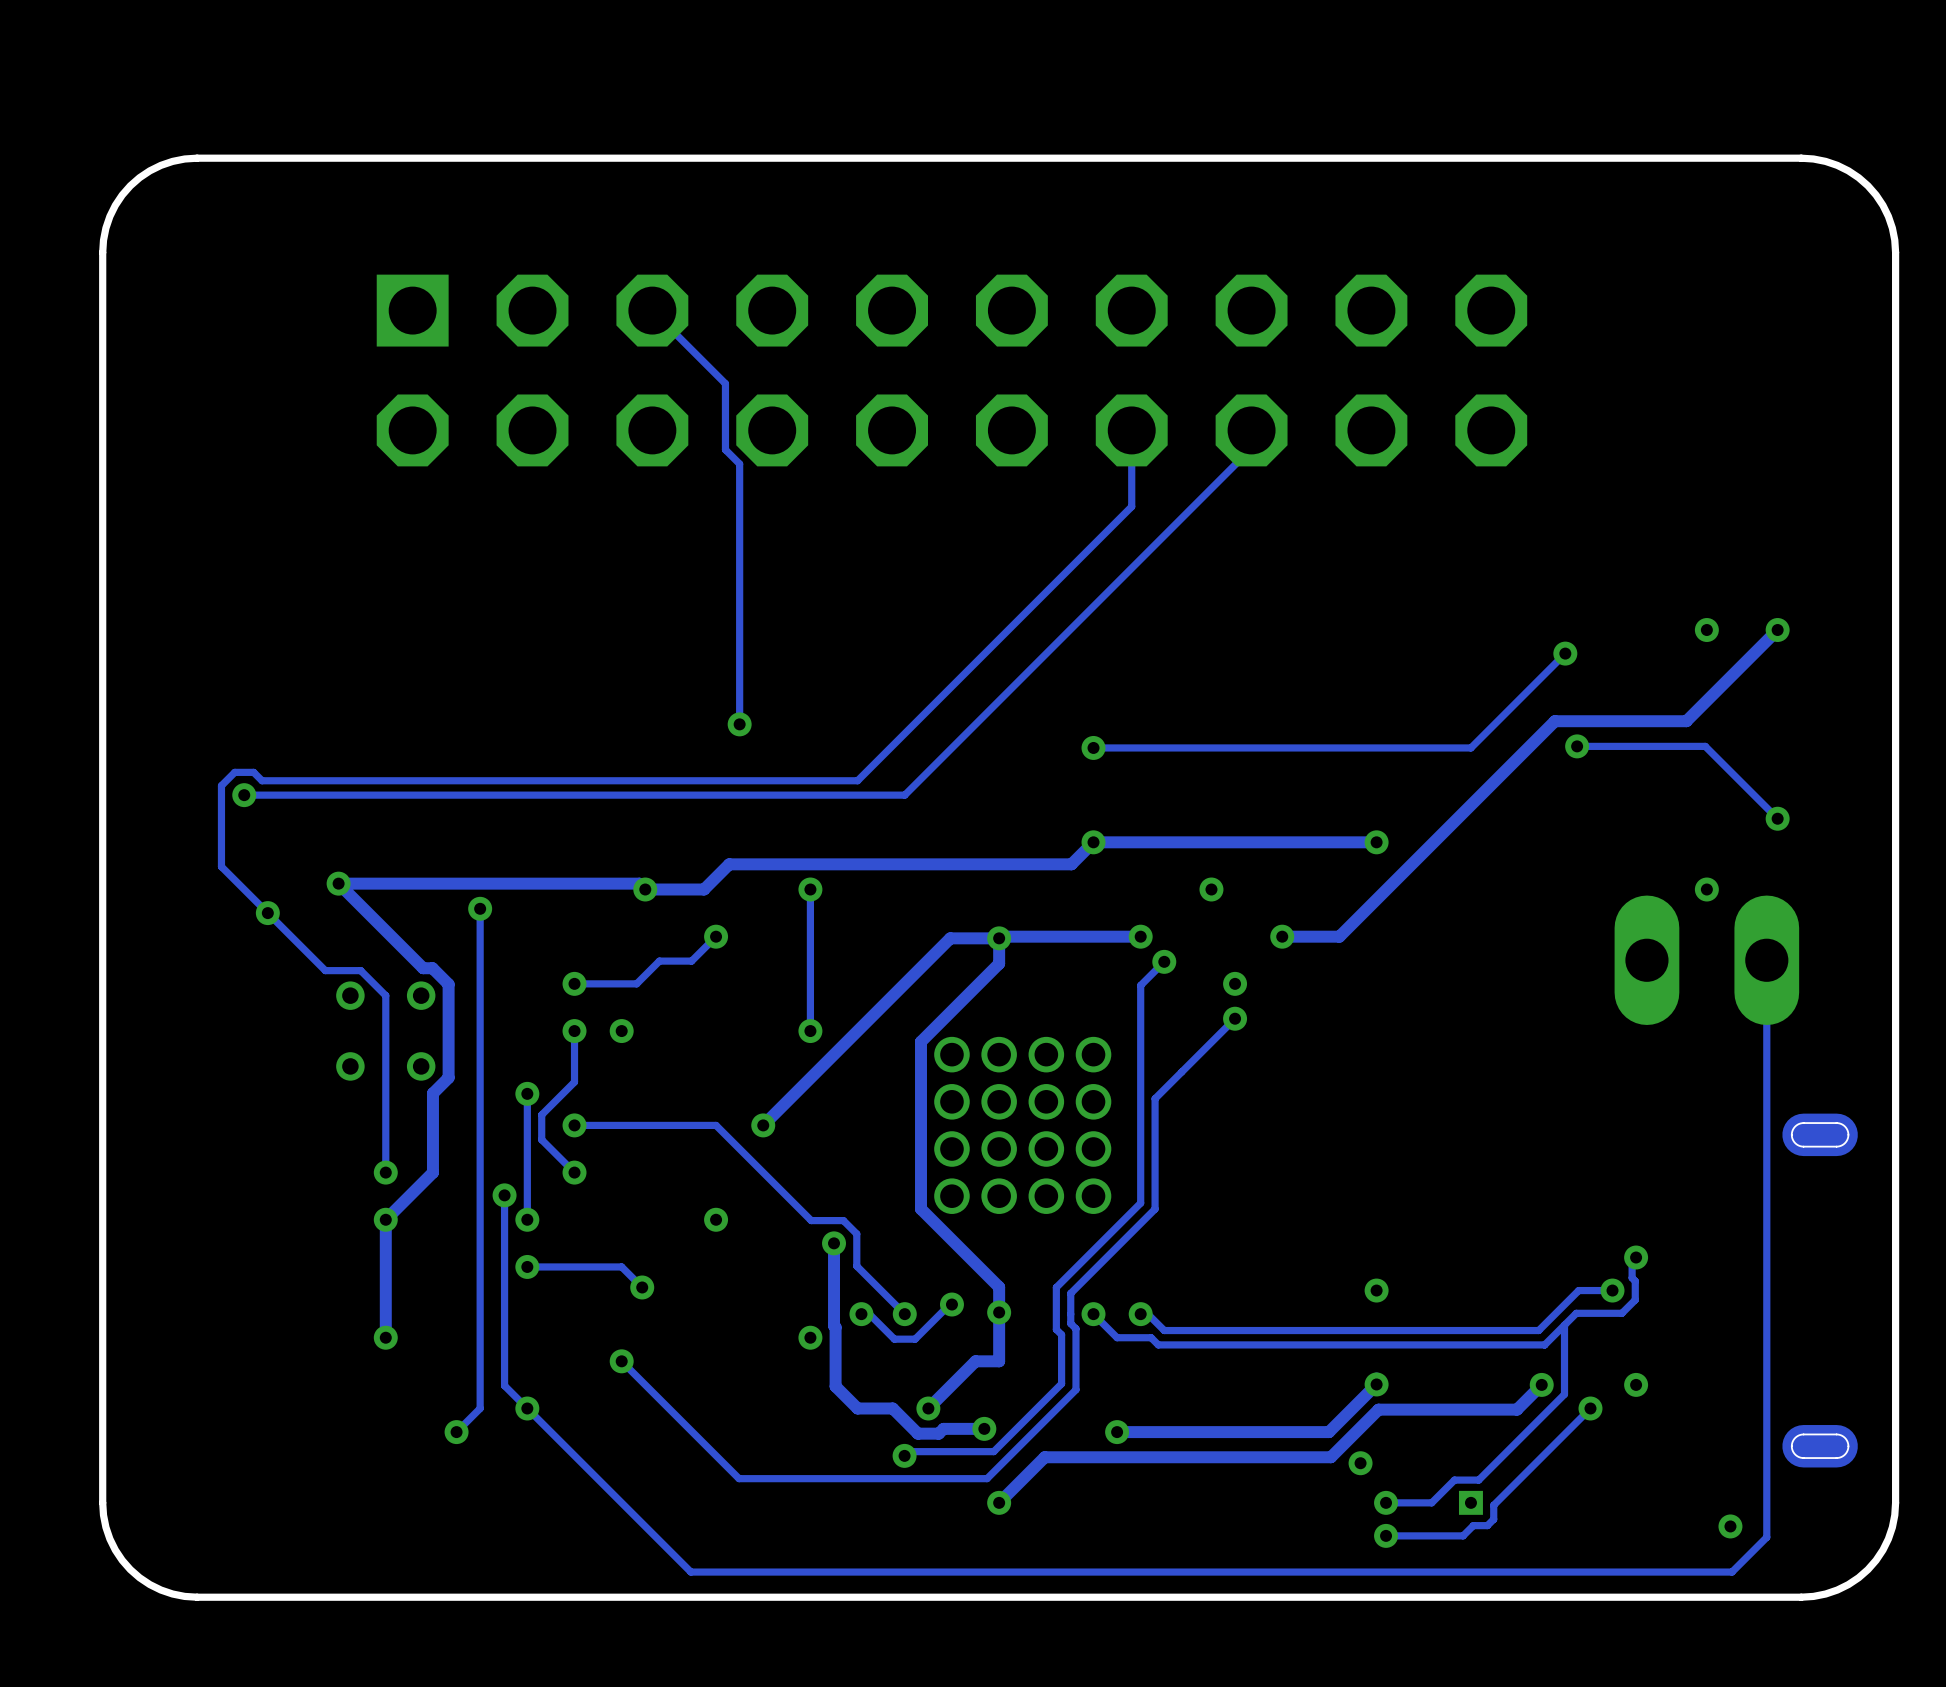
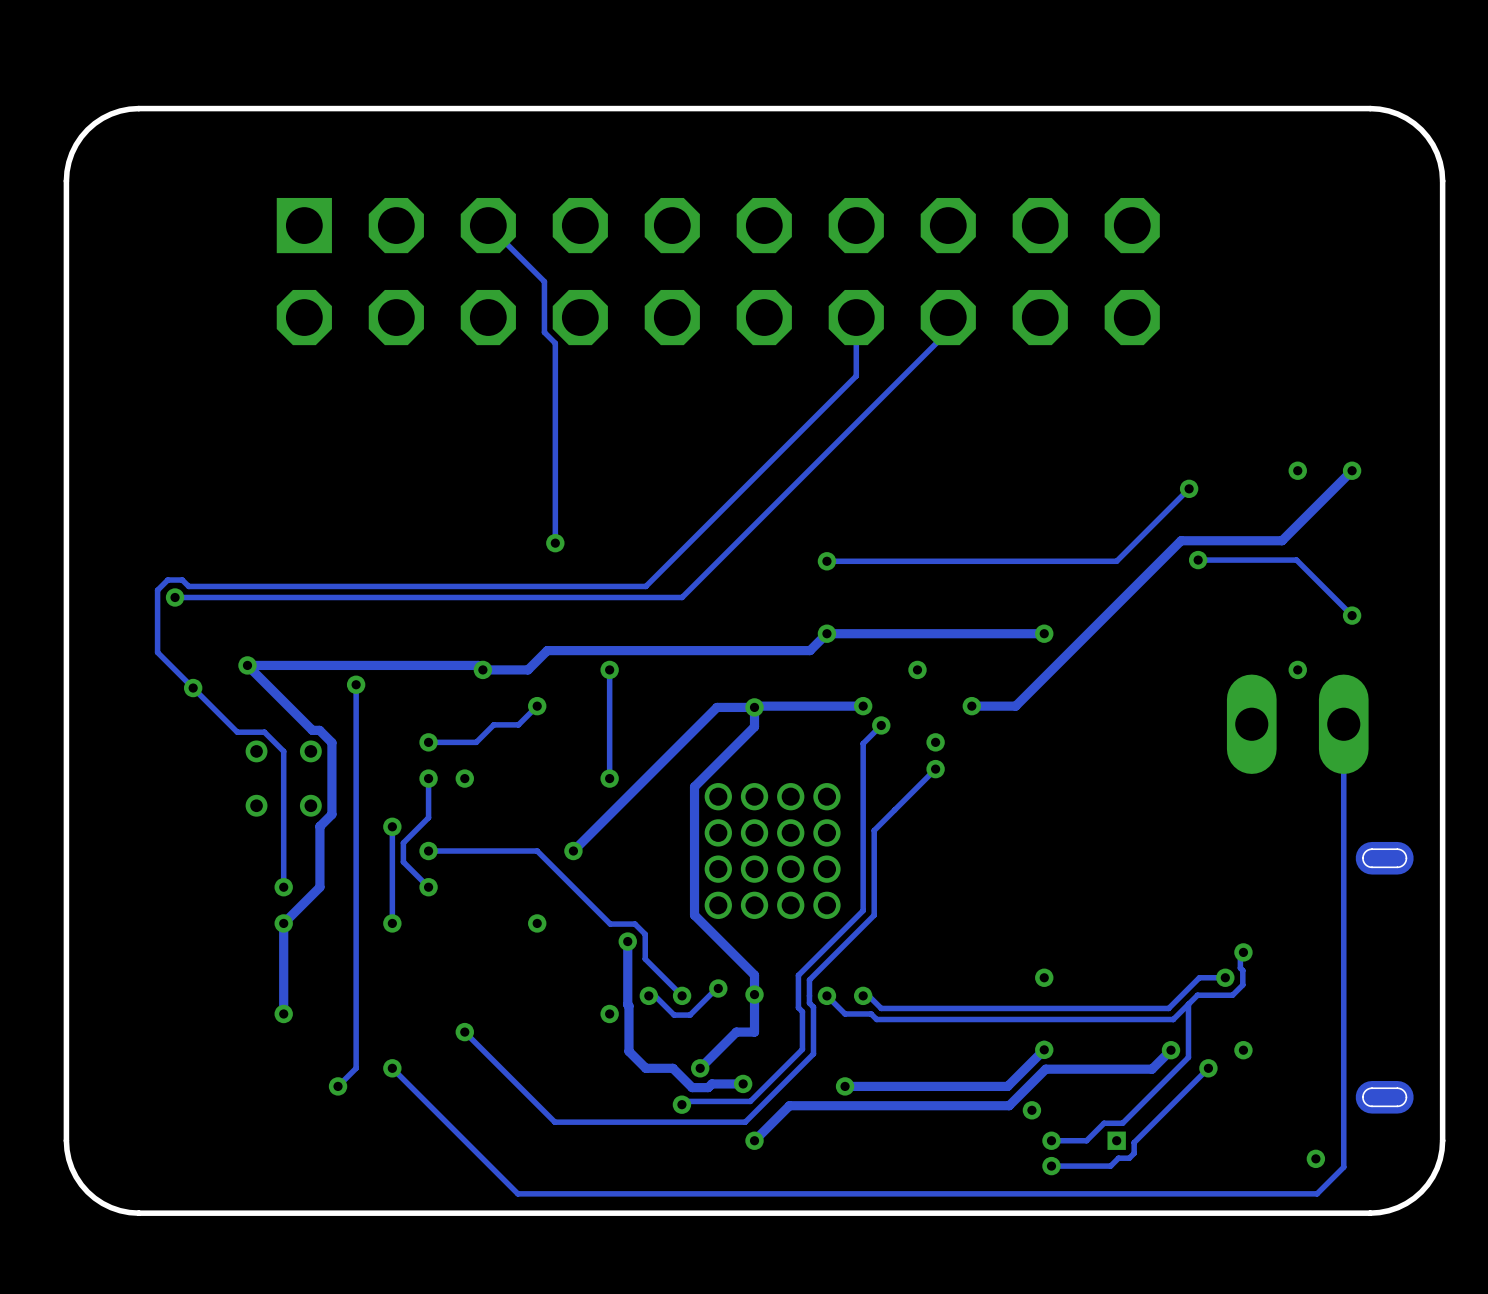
track: (504, 1195) (504, 1385) (527, 1408) -> none
via: (504, 1195) -> none
track: (527, 1266) (621, 1266) (642, 1287) -> none
via: (527, 1266) -> none
via: (642, 1287) -> none

